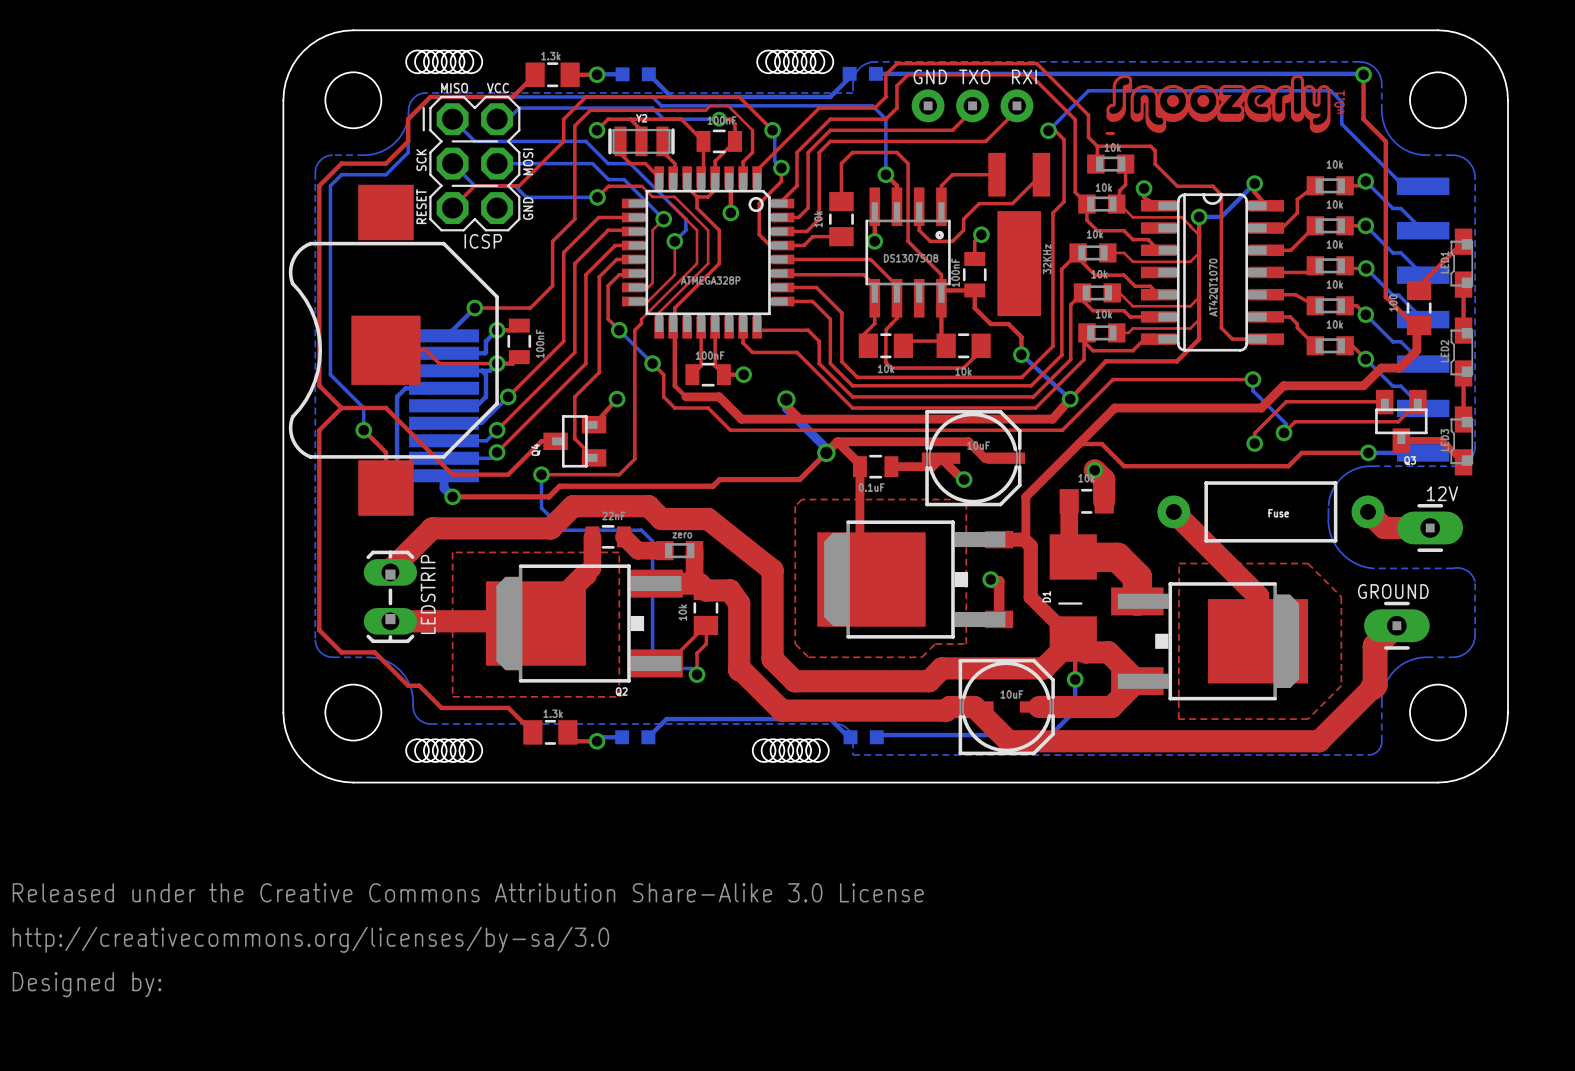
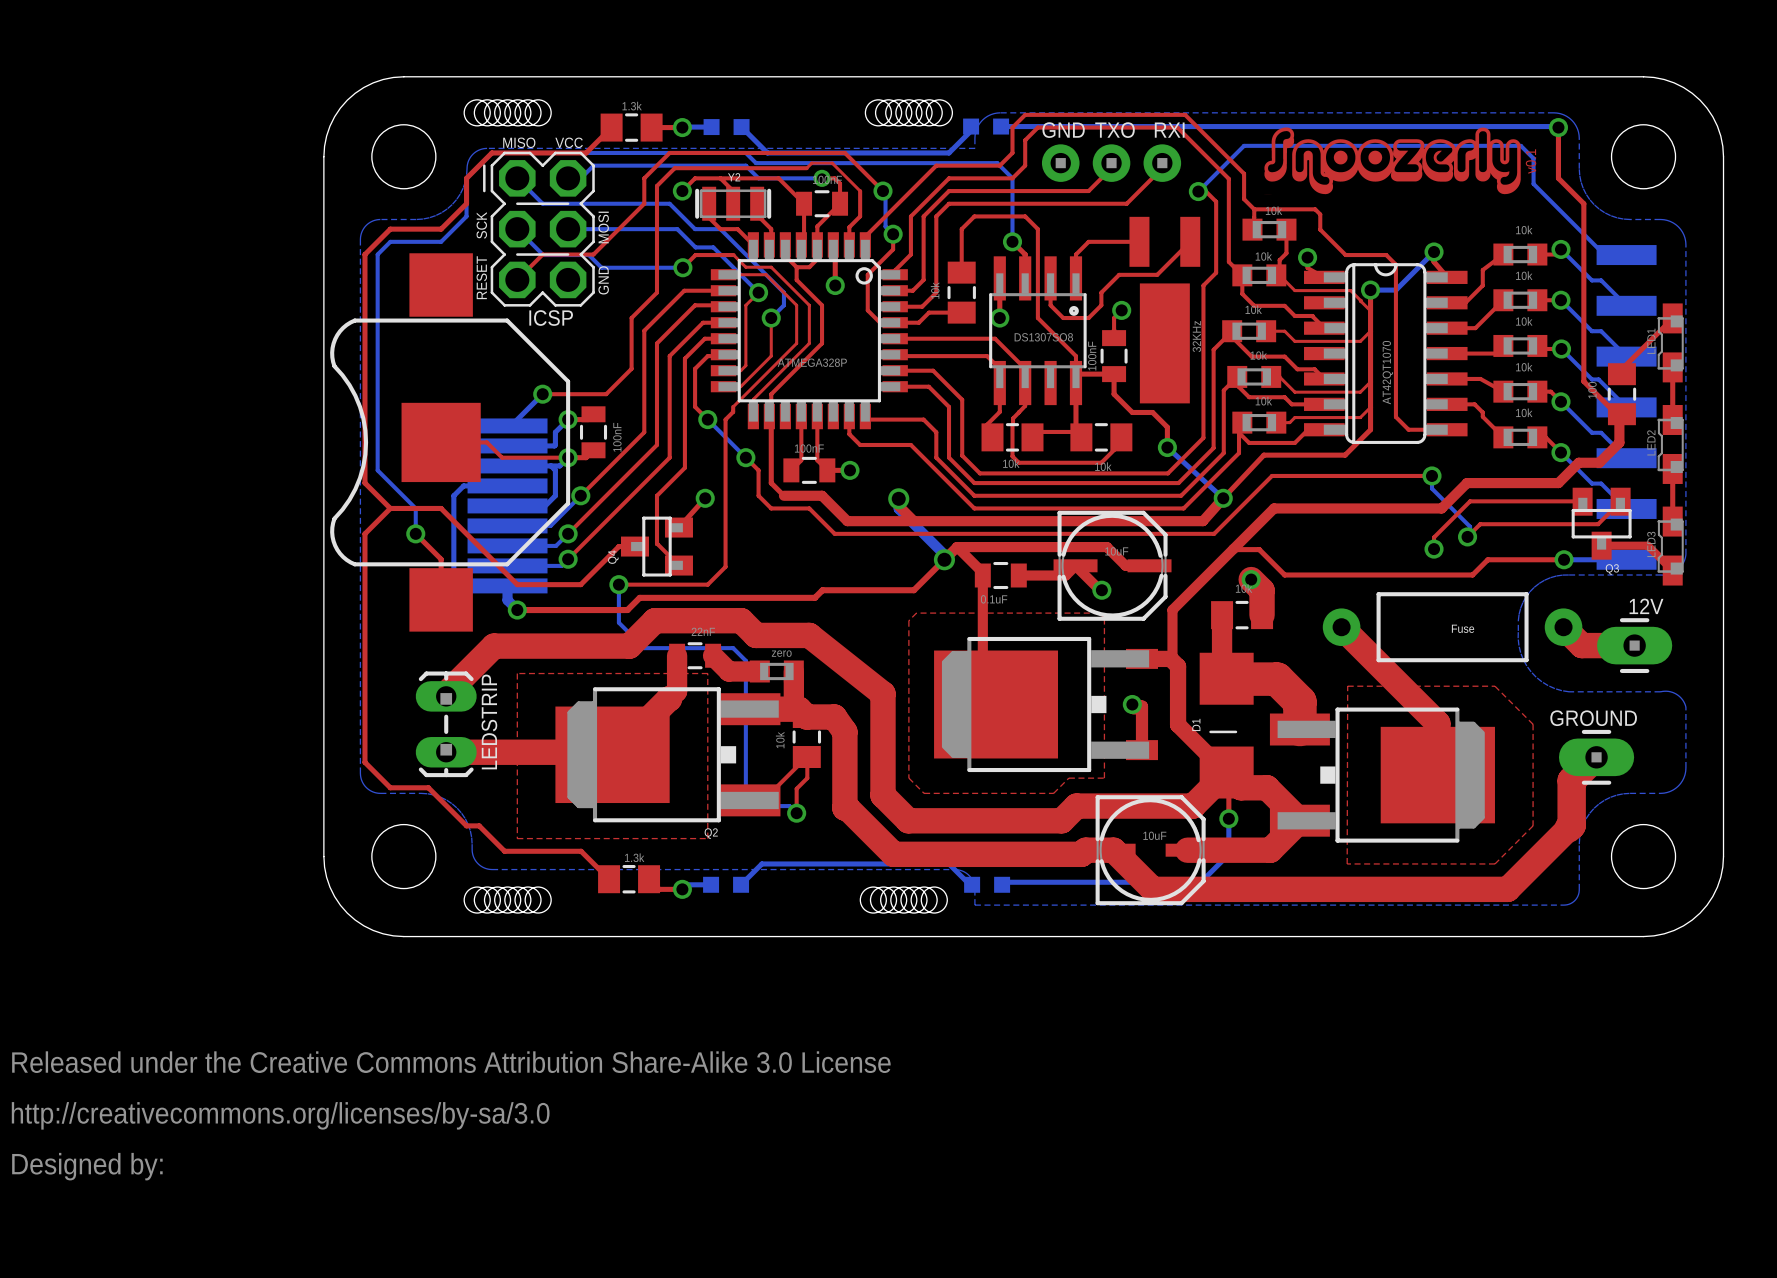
top track: none -> (723, 274) (766, 274)

